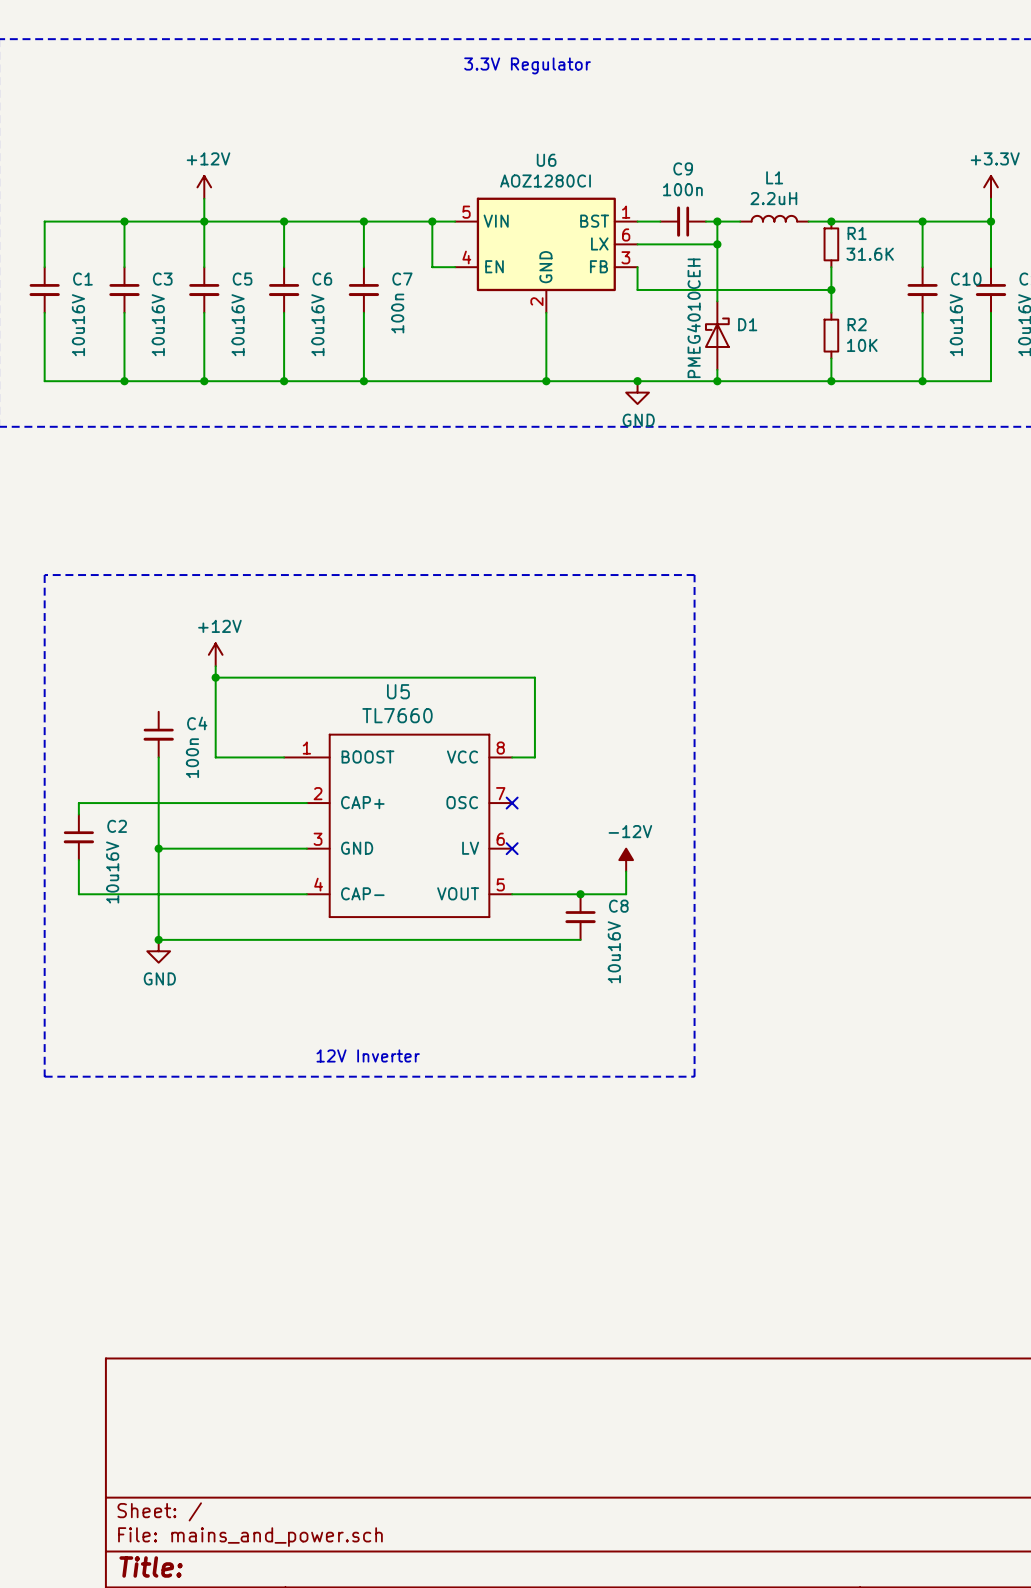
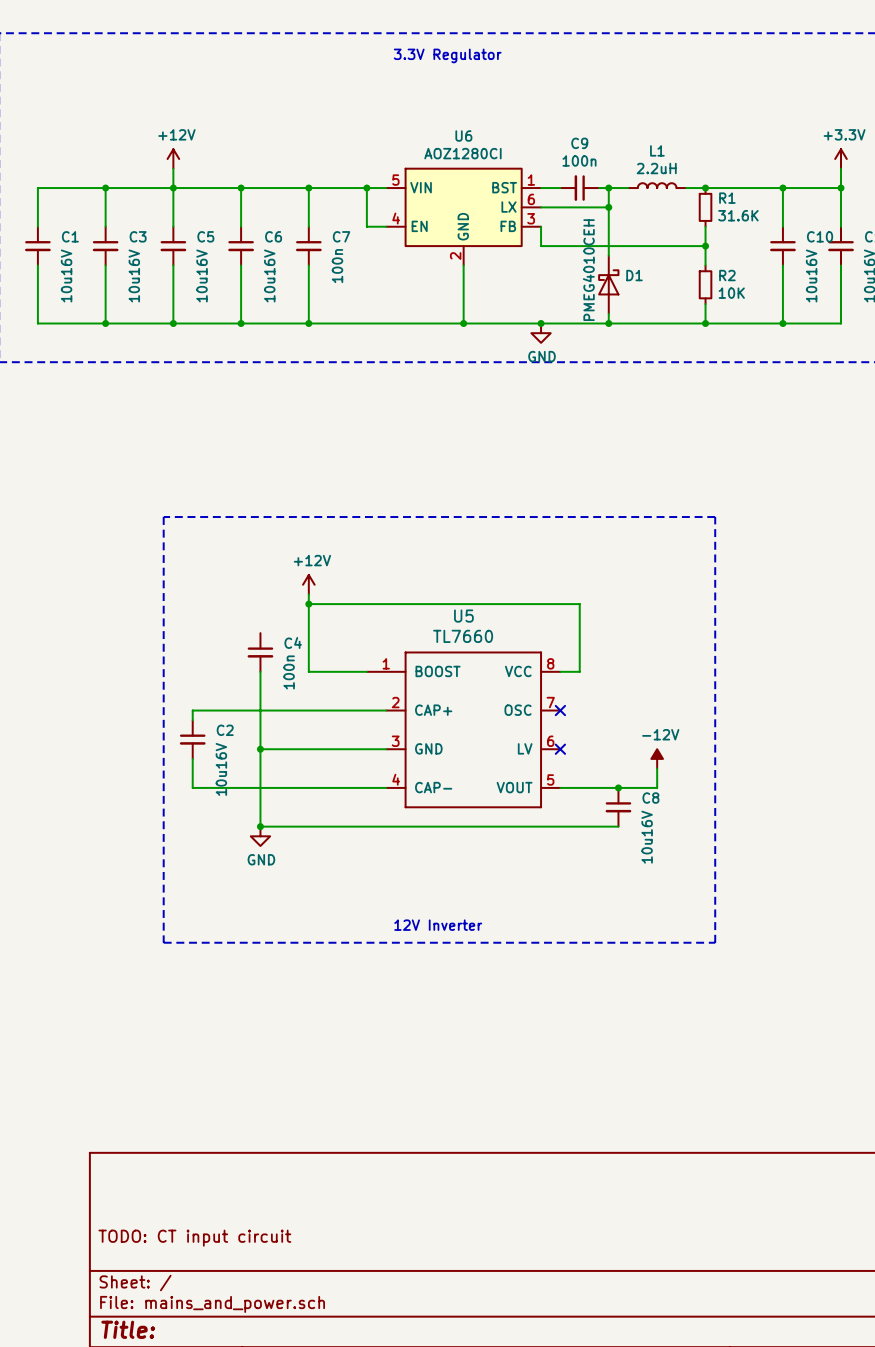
line: (44, 575) (44, 1076) (694, 1076) (694, 575) (44, 575) -> (163, 517) (163, 942) (715, 942) (715, 517) (163, 517)
power symbol position: +12V (215, 654) -> +12V (308, 584)
wire: (215, 666) (215, 757) (284, 757) -> (308, 594) (308, 671) (366, 671)
wire: (215, 677) (534, 677) (534, 757) (512, 757) -> (308, 604) (579, 604) (579, 671) (560, 671)
junction: (215, 677) -> none
junction: none -> (308, 604)
C4 position: (158, 734) -> (260, 652)
wire: (158, 757) (158, 939) (580, 939) -> (260, 671) (260, 826) (618, 826)
wire: (306, 803) (78, 803) (78, 814) -> (386, 710) (192, 710) (192, 720)
no-connect mark: (512, 803) -> none
U5 position: (398, 825) -> (463, 729)
C2 position: (78, 837) -> (192, 739)
no-connect mark: none -> (560, 710)
wire: (158, 848) (306, 848) -> (260, 749) (386, 749)
junction: (158, 848) -> none
no-connect mark: (512, 848) -> none
wire: (78, 860) (78, 894) (306, 894) -> (192, 758) (192, 787) (386, 787)
power symbol position: -12V (626, 860) -> -12V (657, 758)
wire: (626, 871) (626, 894) (512, 894) -> (657, 768) (657, 787) (560, 787)
junction: none -> (260, 749)
no-connect mark: none -> (560, 749)
junction: (580, 894) -> none
C8 position: (580, 917) -> (618, 807)
junction: none -> (618, 787)
junction: (158, 939) -> none
power symbol position: GND (158, 951) -> GND (260, 836)
junction: none -> (260, 826)
text position: 12V Inverter (368, 1055) -> 12V Inverter (438, 925)
title block: none -> TODO: CT input circuit (194, 1238)

